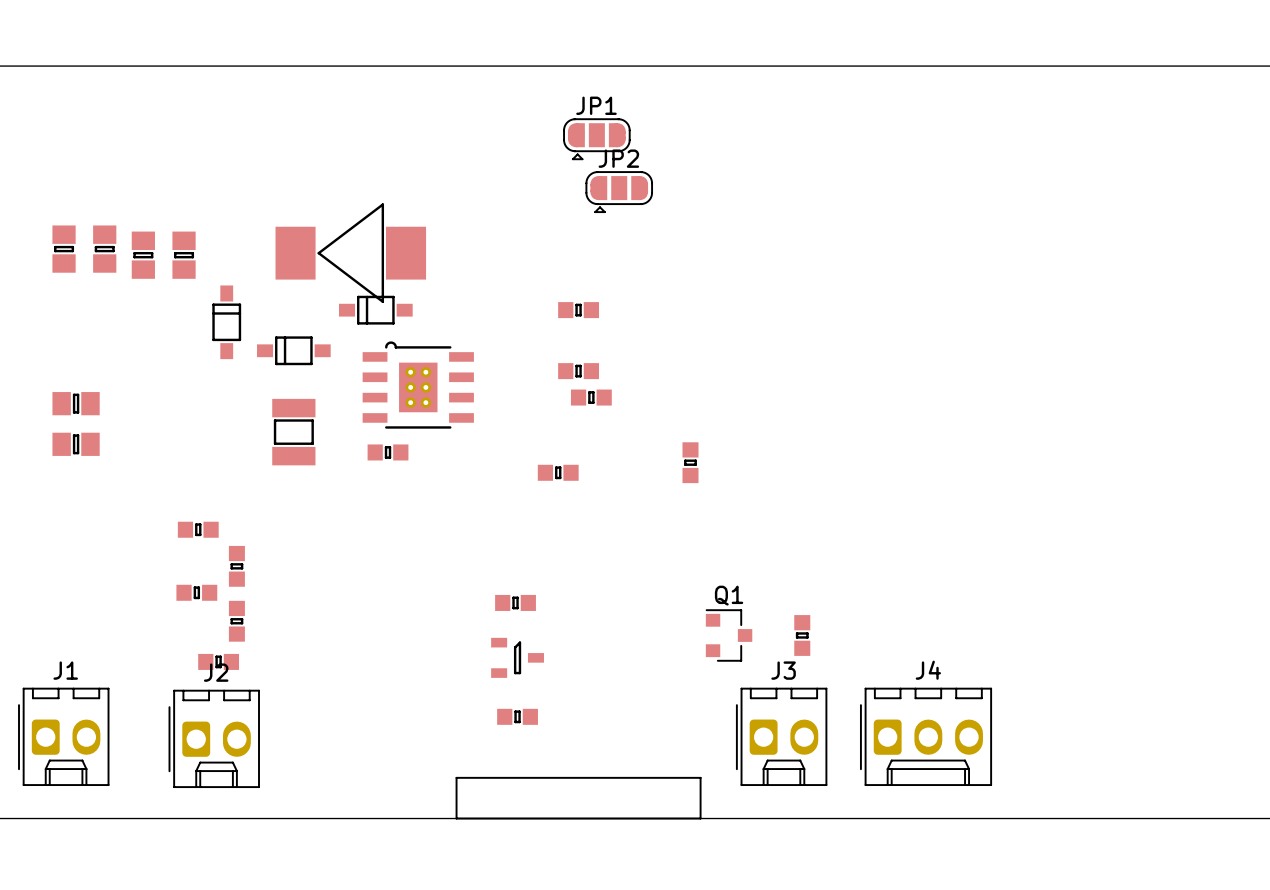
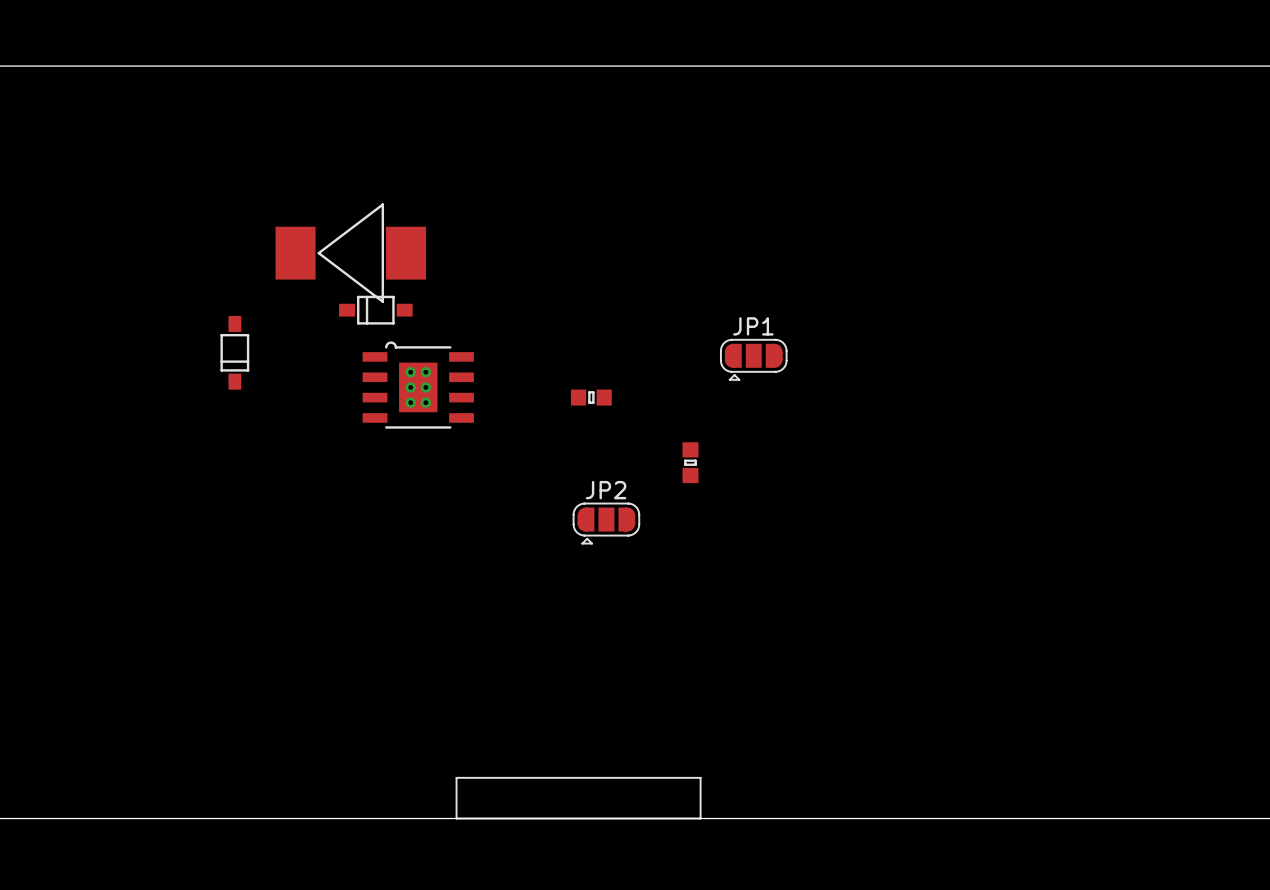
JP1 position: (596, 139) -> (753, 359)
JP2 position: (619, 192) -> (606, 523)
part: (64, 249) -> none
part: (104, 249) -> none
part: (143, 255) -> none
part: (184, 255) -> none
part: (578, 310) -> none
part: (226, 322) -> none
part: (293, 350) -> none
part: none -> (234, 352)
part: (578, 371) -> none
part: (76, 403) -> none
part: (293, 432) -> none
part: (76, 444) -> none
part: (388, 452) -> none
part: (558, 472) -> none
part: (198, 529) -> none
part: (236, 566) -> none
part: (196, 592) -> none
part: (515, 602) -> none
part: (236, 621) -> none
Q1: (728, 635) -> none
part: (802, 635) -> none
part: (517, 657) -> none
part: (218, 661) -> none
part: (517, 716) -> none
J1: (63, 736) -> none
J3: (781, 736) -> none
J4: (926, 736) -> none
J2: (214, 738) -> none

